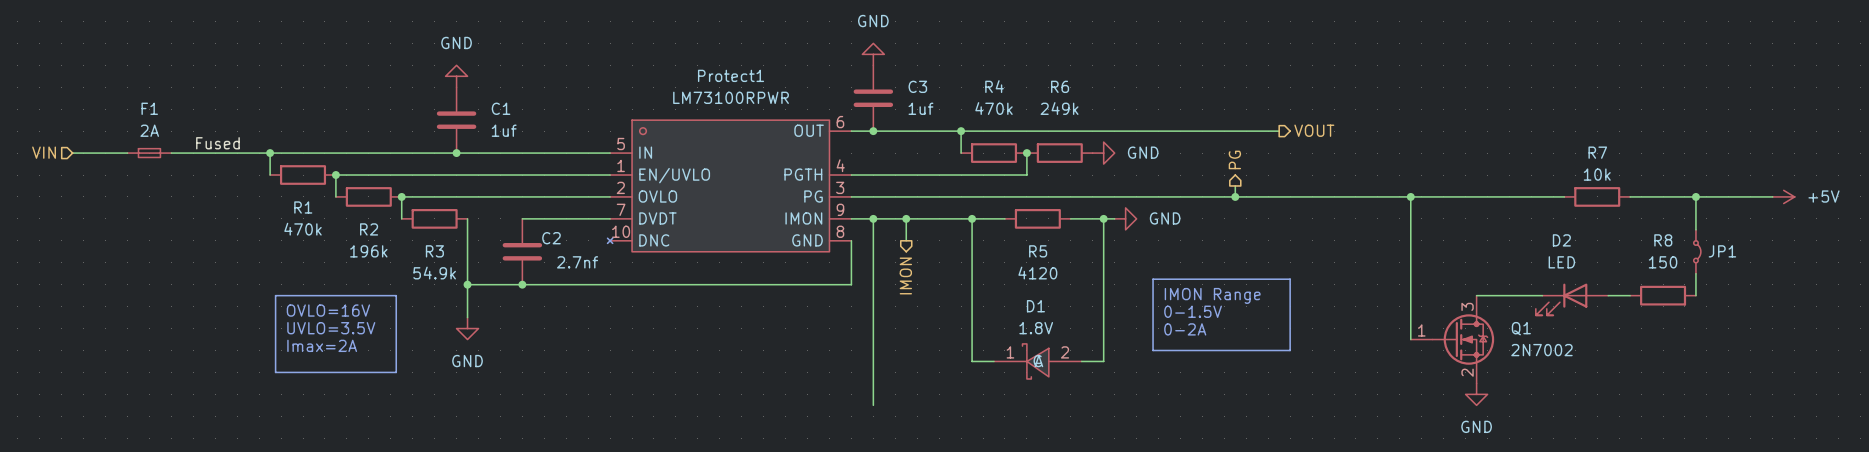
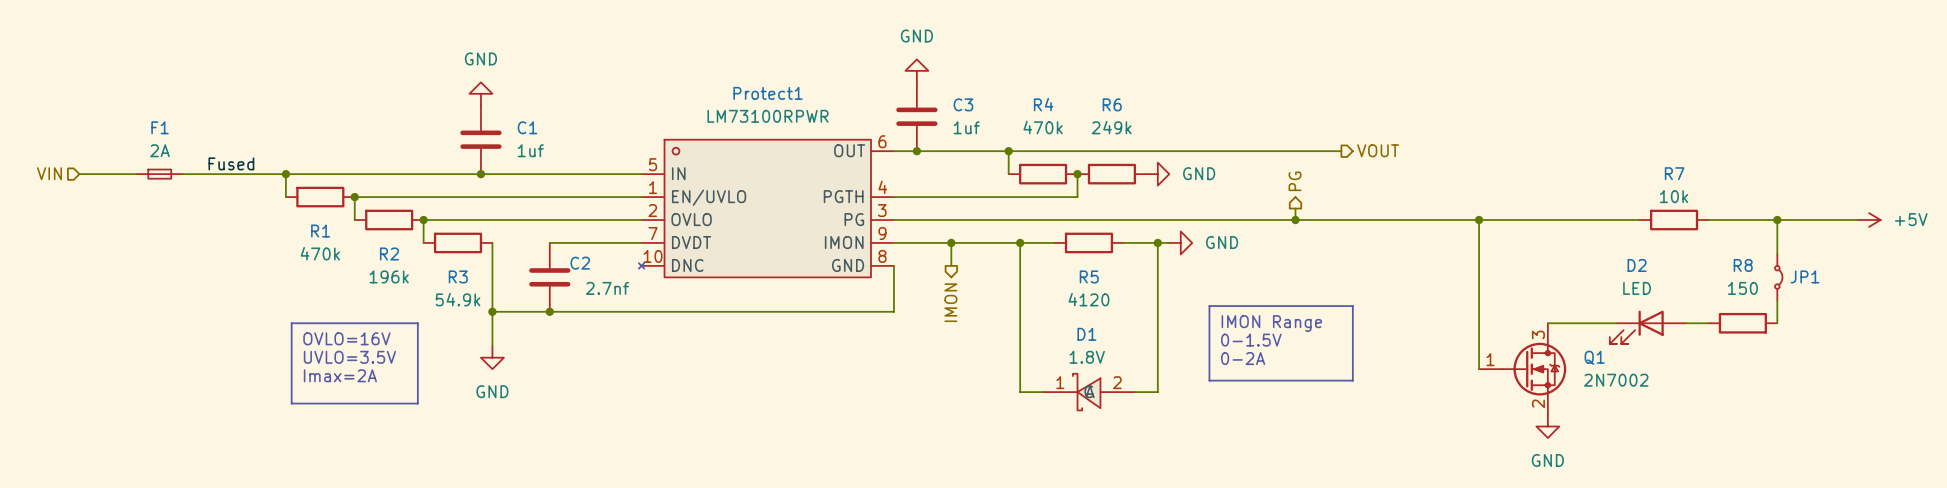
wire: (873, 218) (873, 405) -> none
junction: (873, 218) -> none

